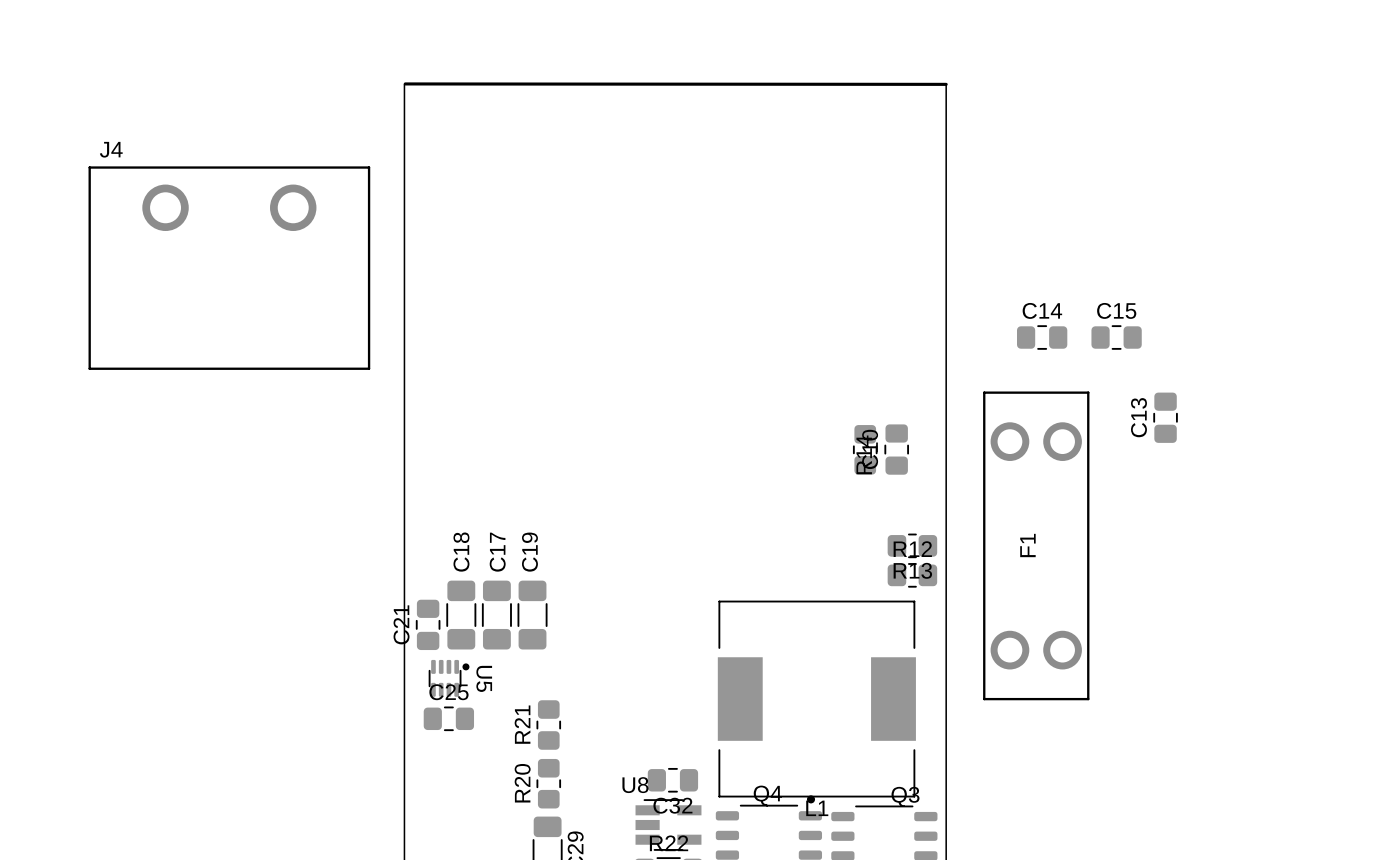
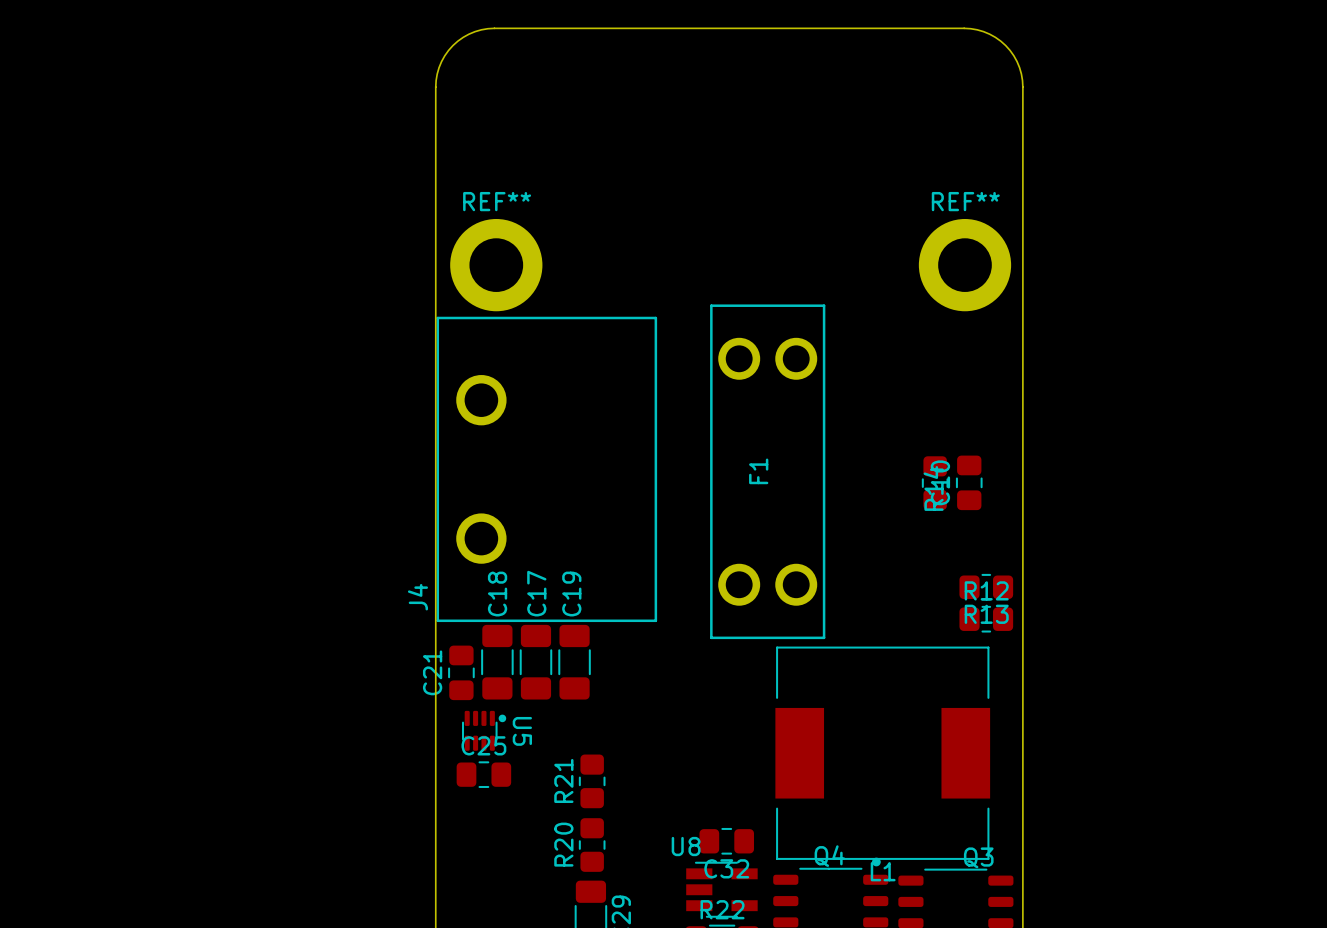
board edge: (405, 83) (946, 84) -> (435, 87) (441, 61) (452, 45) (475, 31) (494, 28) (970, 28) (989, 34) (1010, 50) (1019, 67) (1022, 87)
REF**: none -> (496, 265)
REF**: none -> (964, 265)
J4 rotation: 0° (229, 268) -> 90° counterclockwise (546, 469)
J4 position: (229, 268) -> (546, 469)
C14: (1042, 337) -> none
C15: (1116, 337) -> none
C13: (1165, 417) -> none
F1 position: (1036, 545) -> (767, 471)

